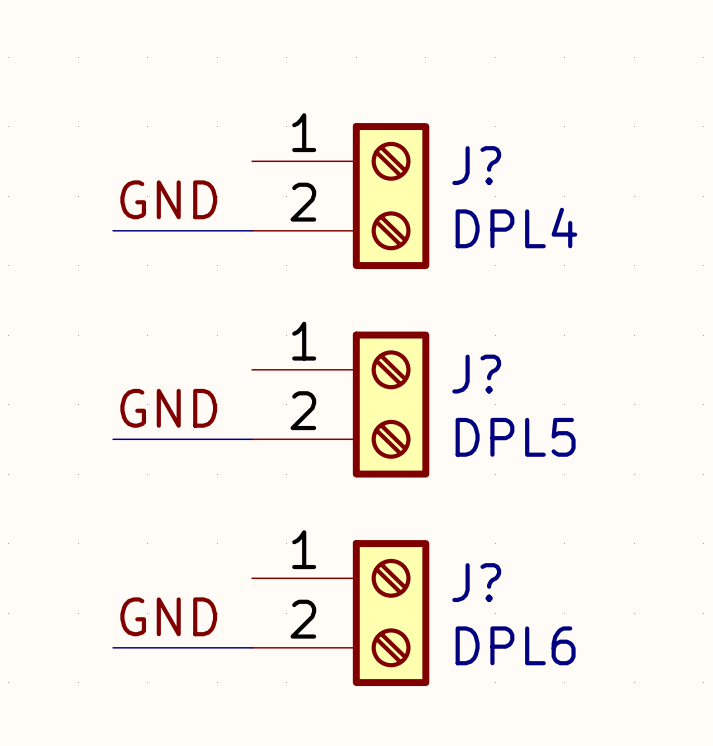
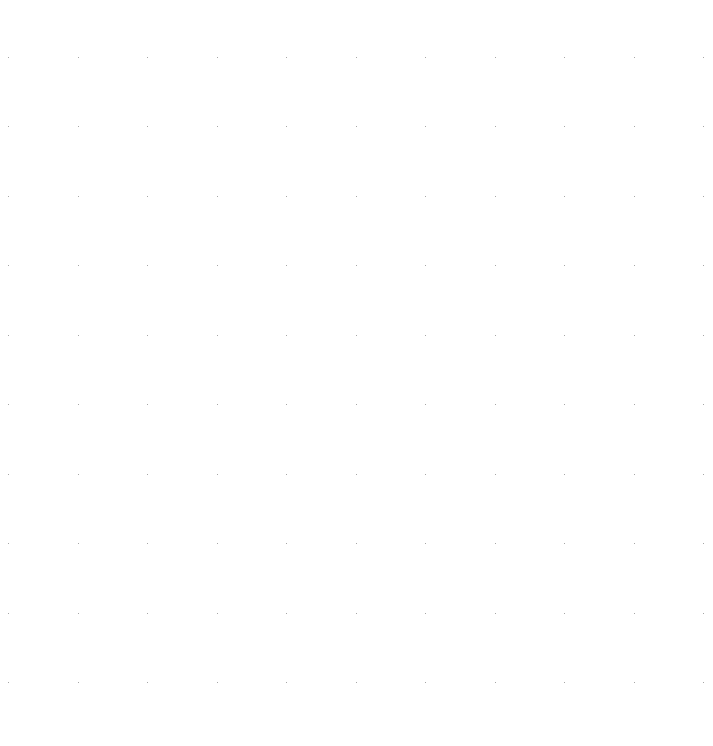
J?: DPL4 (340, 196) -> none
label: GND (168, 199) -> none
wire: (113, 230) (252, 230) -> none
J?: DPL5 (340, 404) -> none
label: GND (168, 408) -> none
wire: (113, 439) (252, 439) -> none
J?: DPL6 (340, 613) -> none
label: GND (168, 616) -> none
wire: (113, 647) (252, 647) -> none

